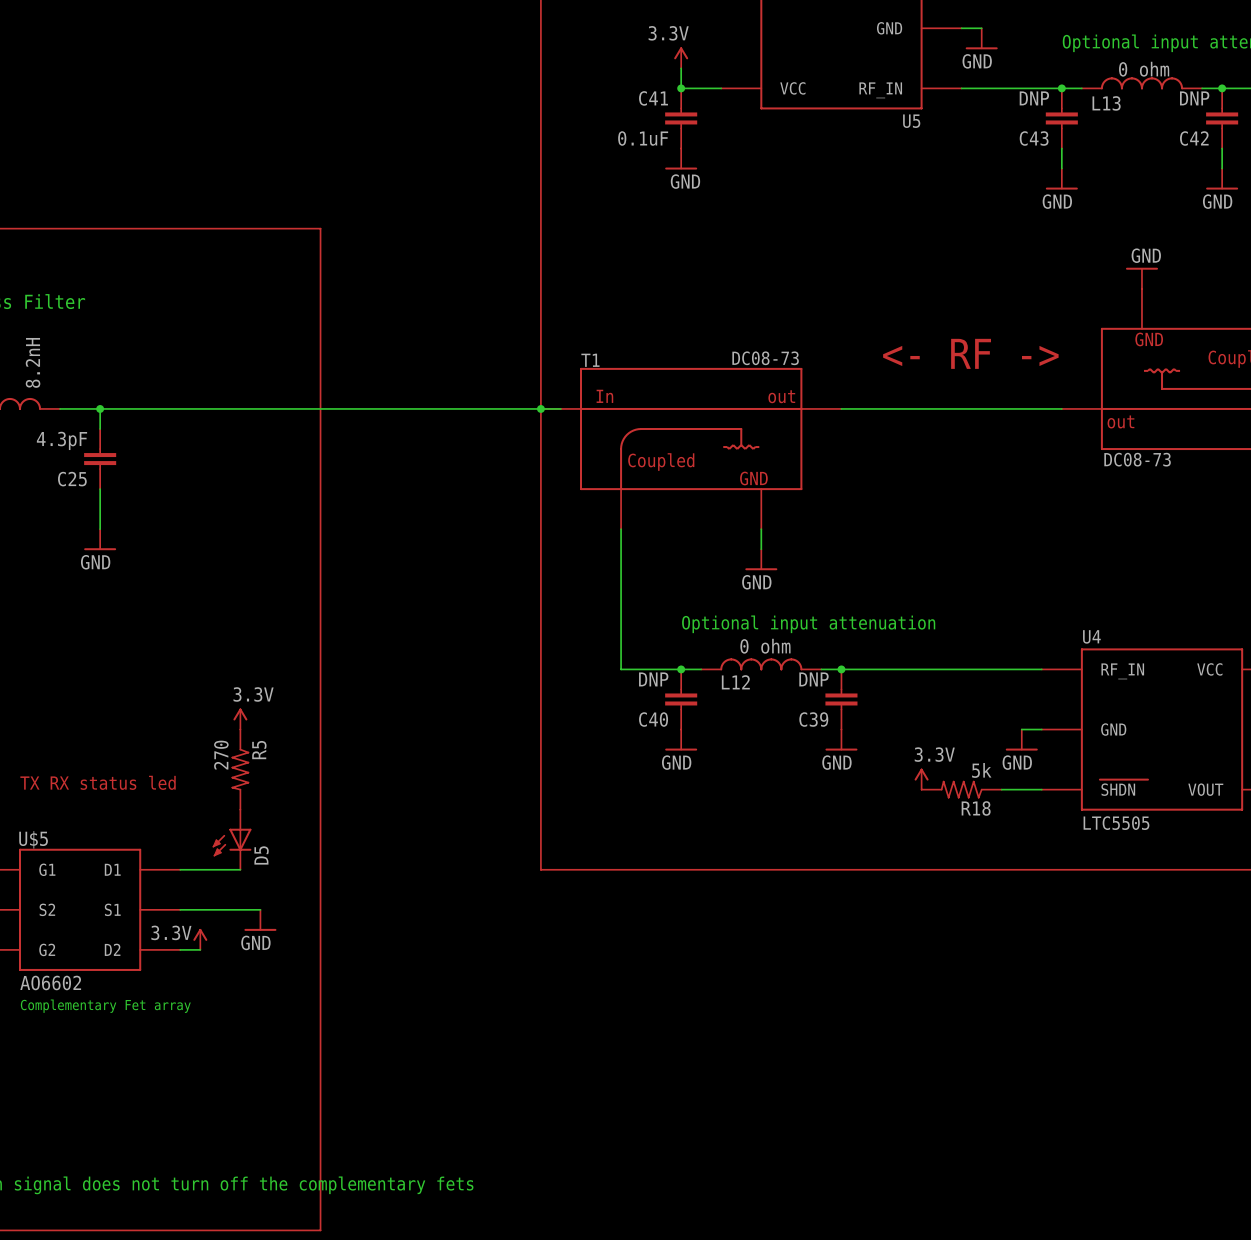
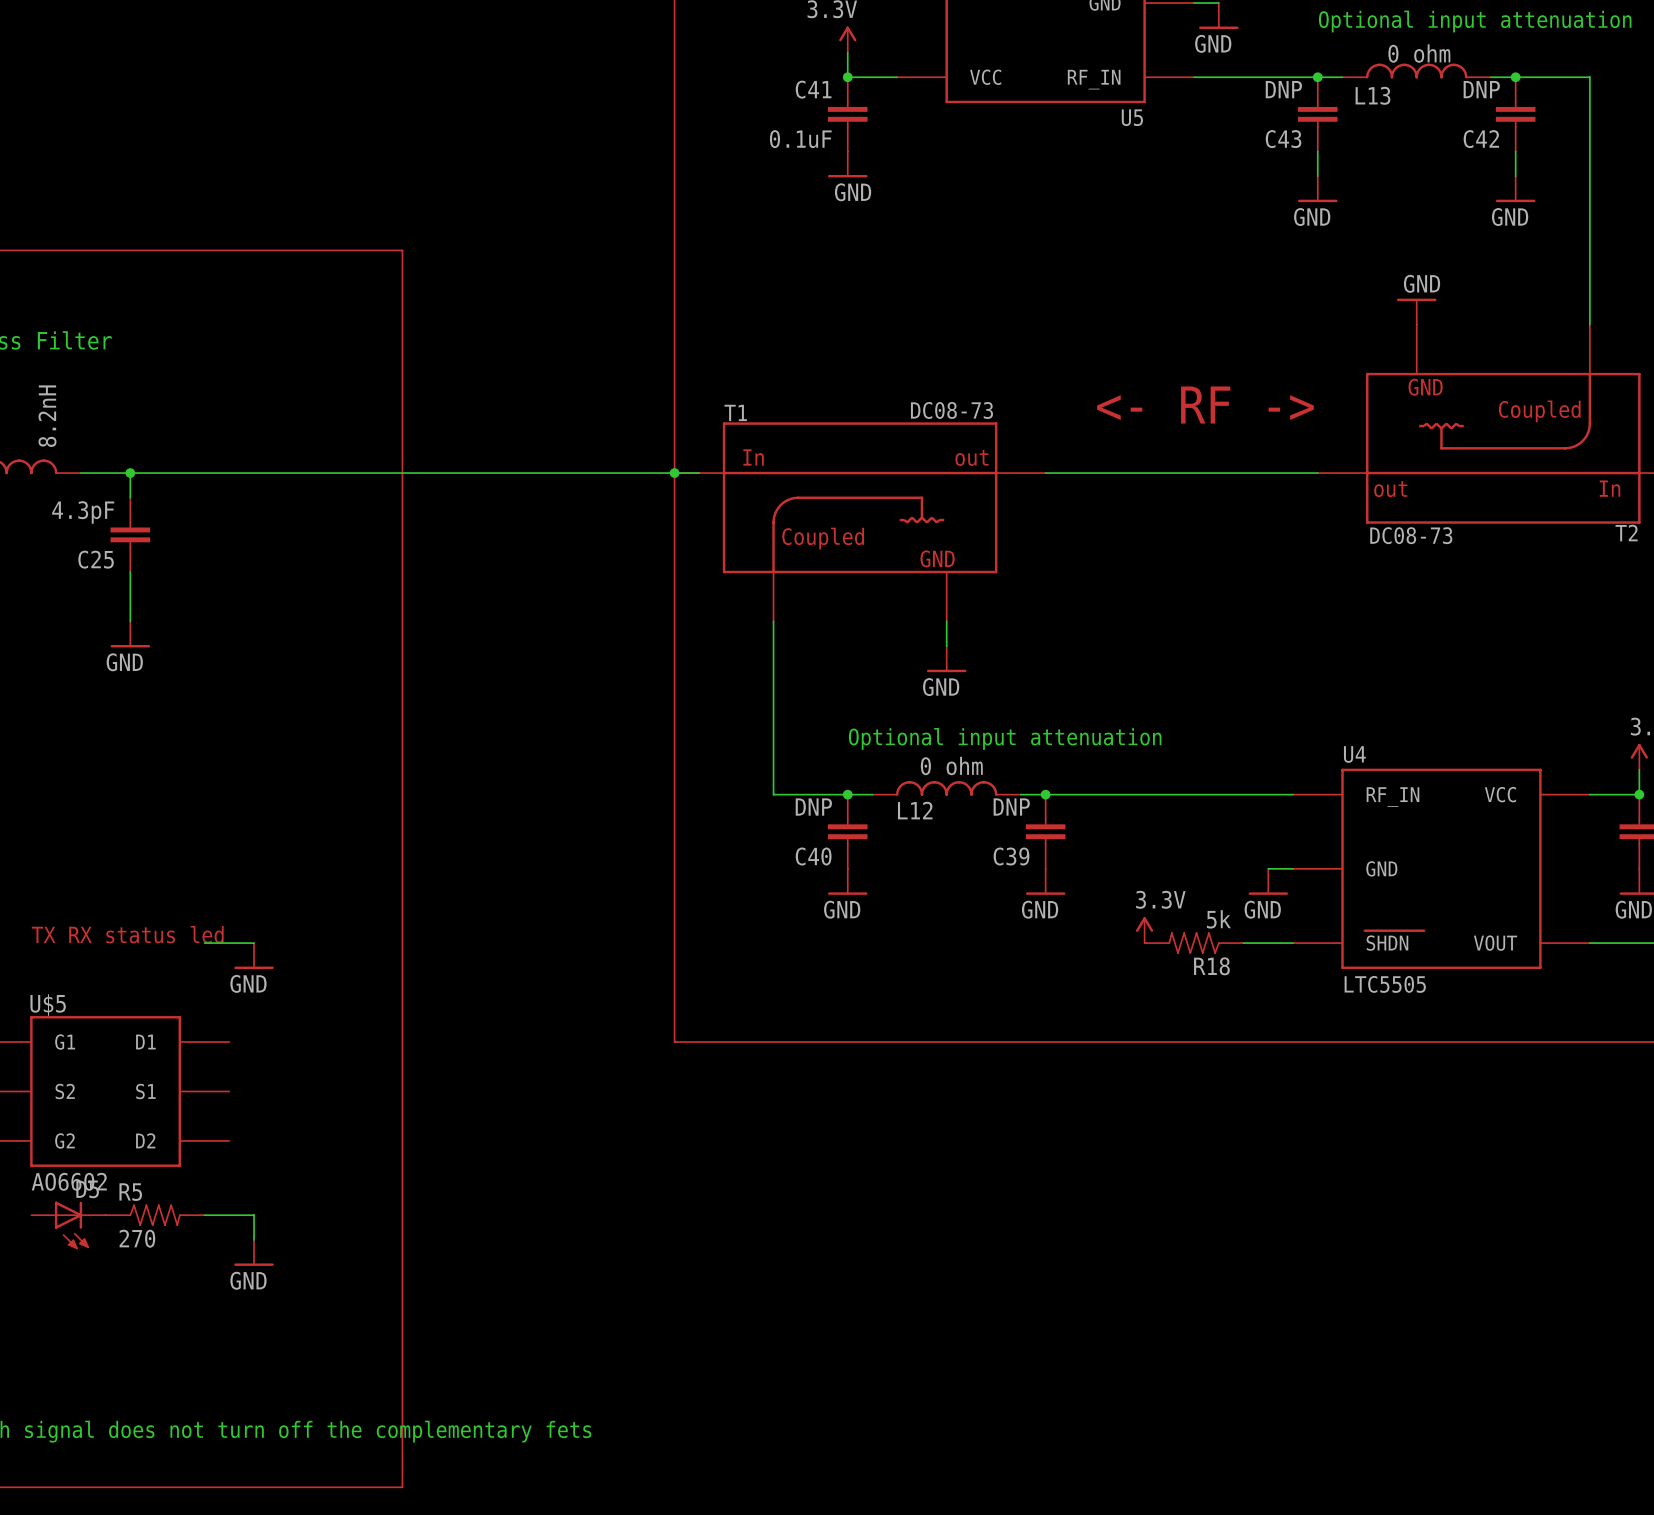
power symbol: 3.3V (240, 719) -> none
R5 rotation: 0° (240, 769) -> 90° counterclockwise (155, 1215)
R5 position: (240, 769) -> (155, 1215)
wire: none -> (204, 943) (254, 943)
power symbol: none -> GND (254, 956)
D5 position: (232, 839) -> (68, 1225)
D5 rotation: 0° (232, 842) -> 90° counterclockwise (71, 1225)
wire: (180, 869) (240, 869) -> none
wire: (180, 909) (260, 909) -> none
power symbol: GND (260, 920) -> none
power symbol: 3.3V (200, 939) -> none
wire: (180, 949) (200, 949) -> none
text: Complementary Fet array (105, 1006) -> none
wire: none -> (204, 1215) (254, 1215) (254, 1239)
power symbol: none -> GND (254, 1252)

